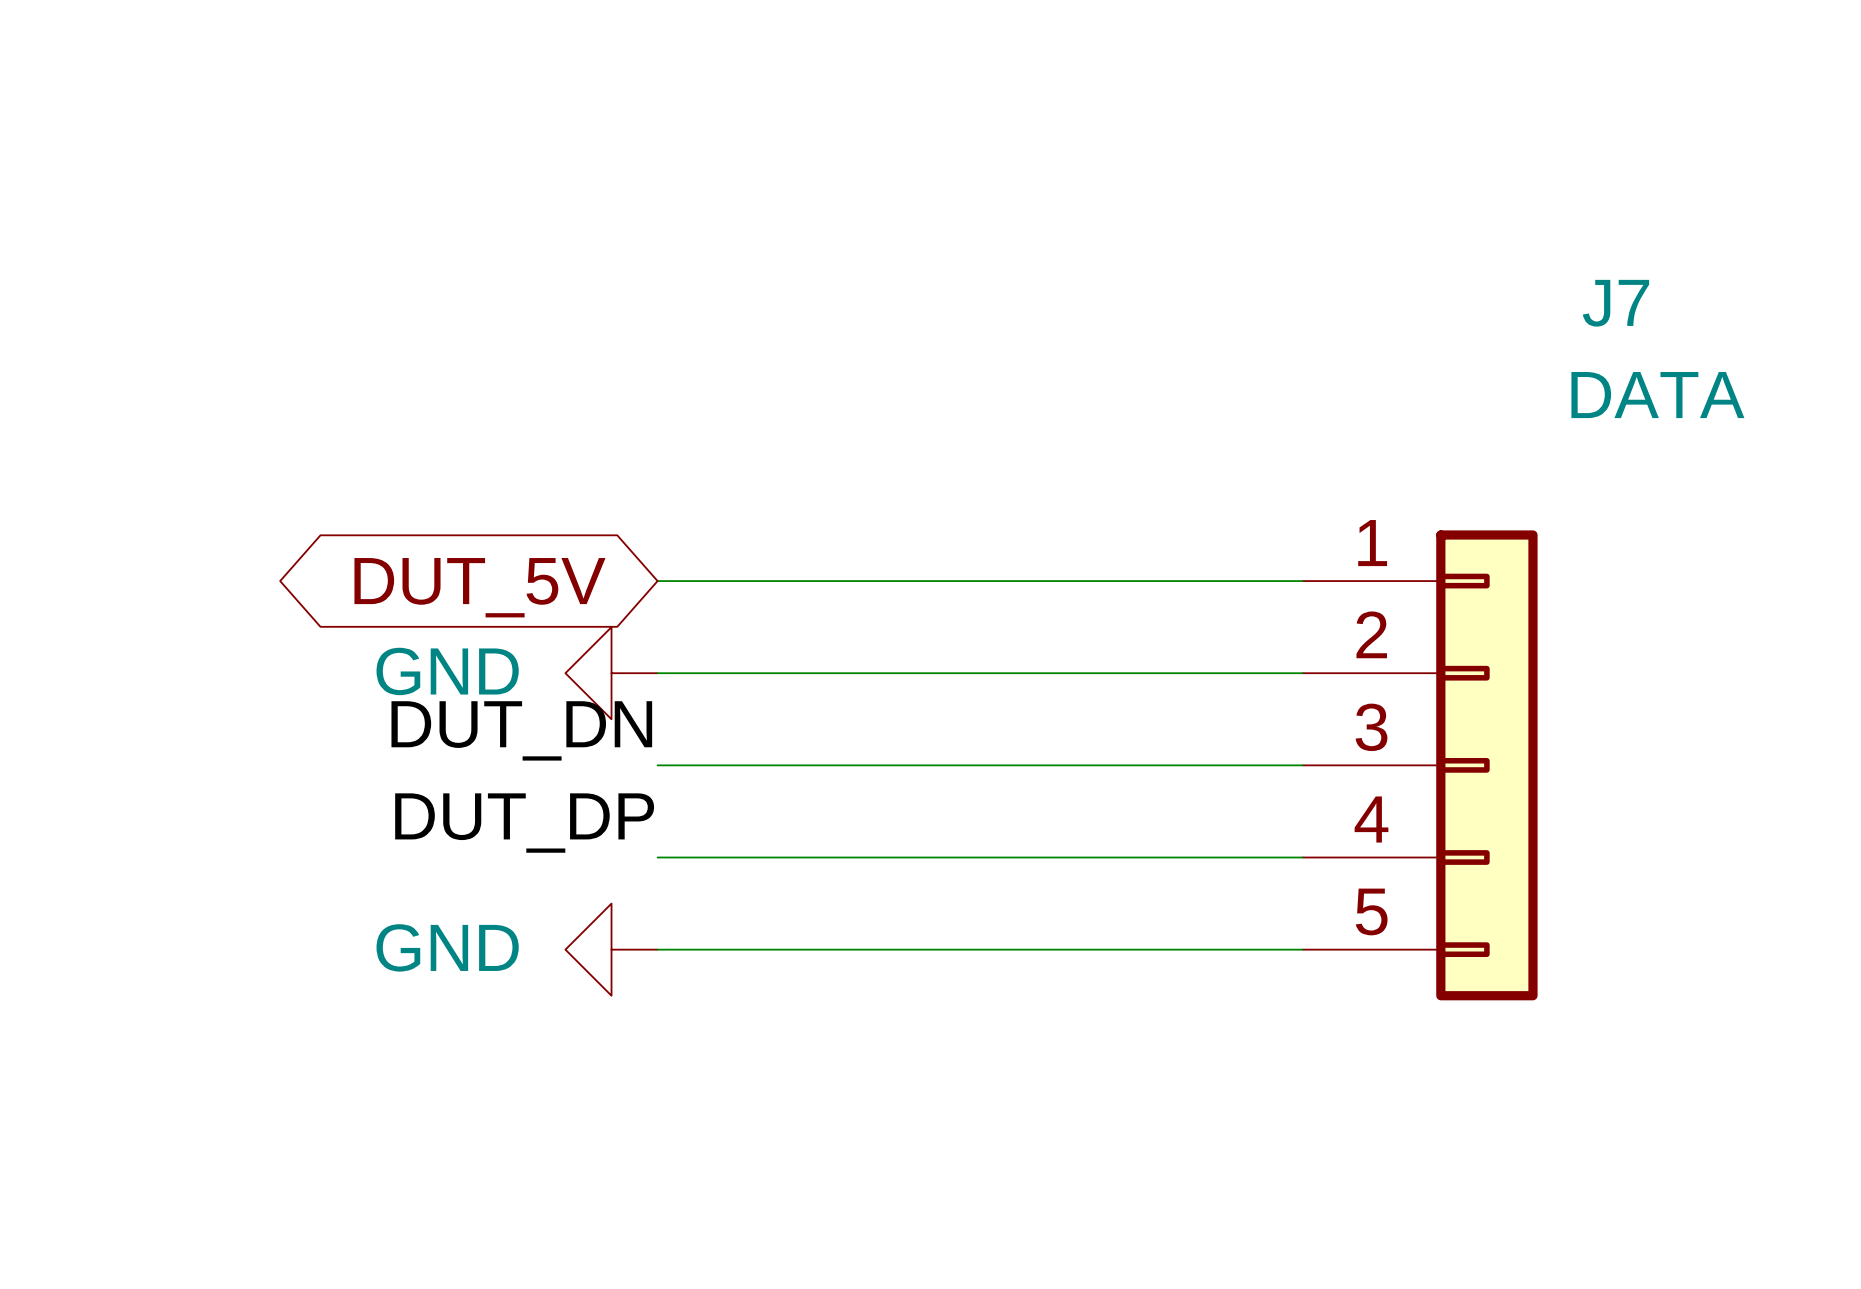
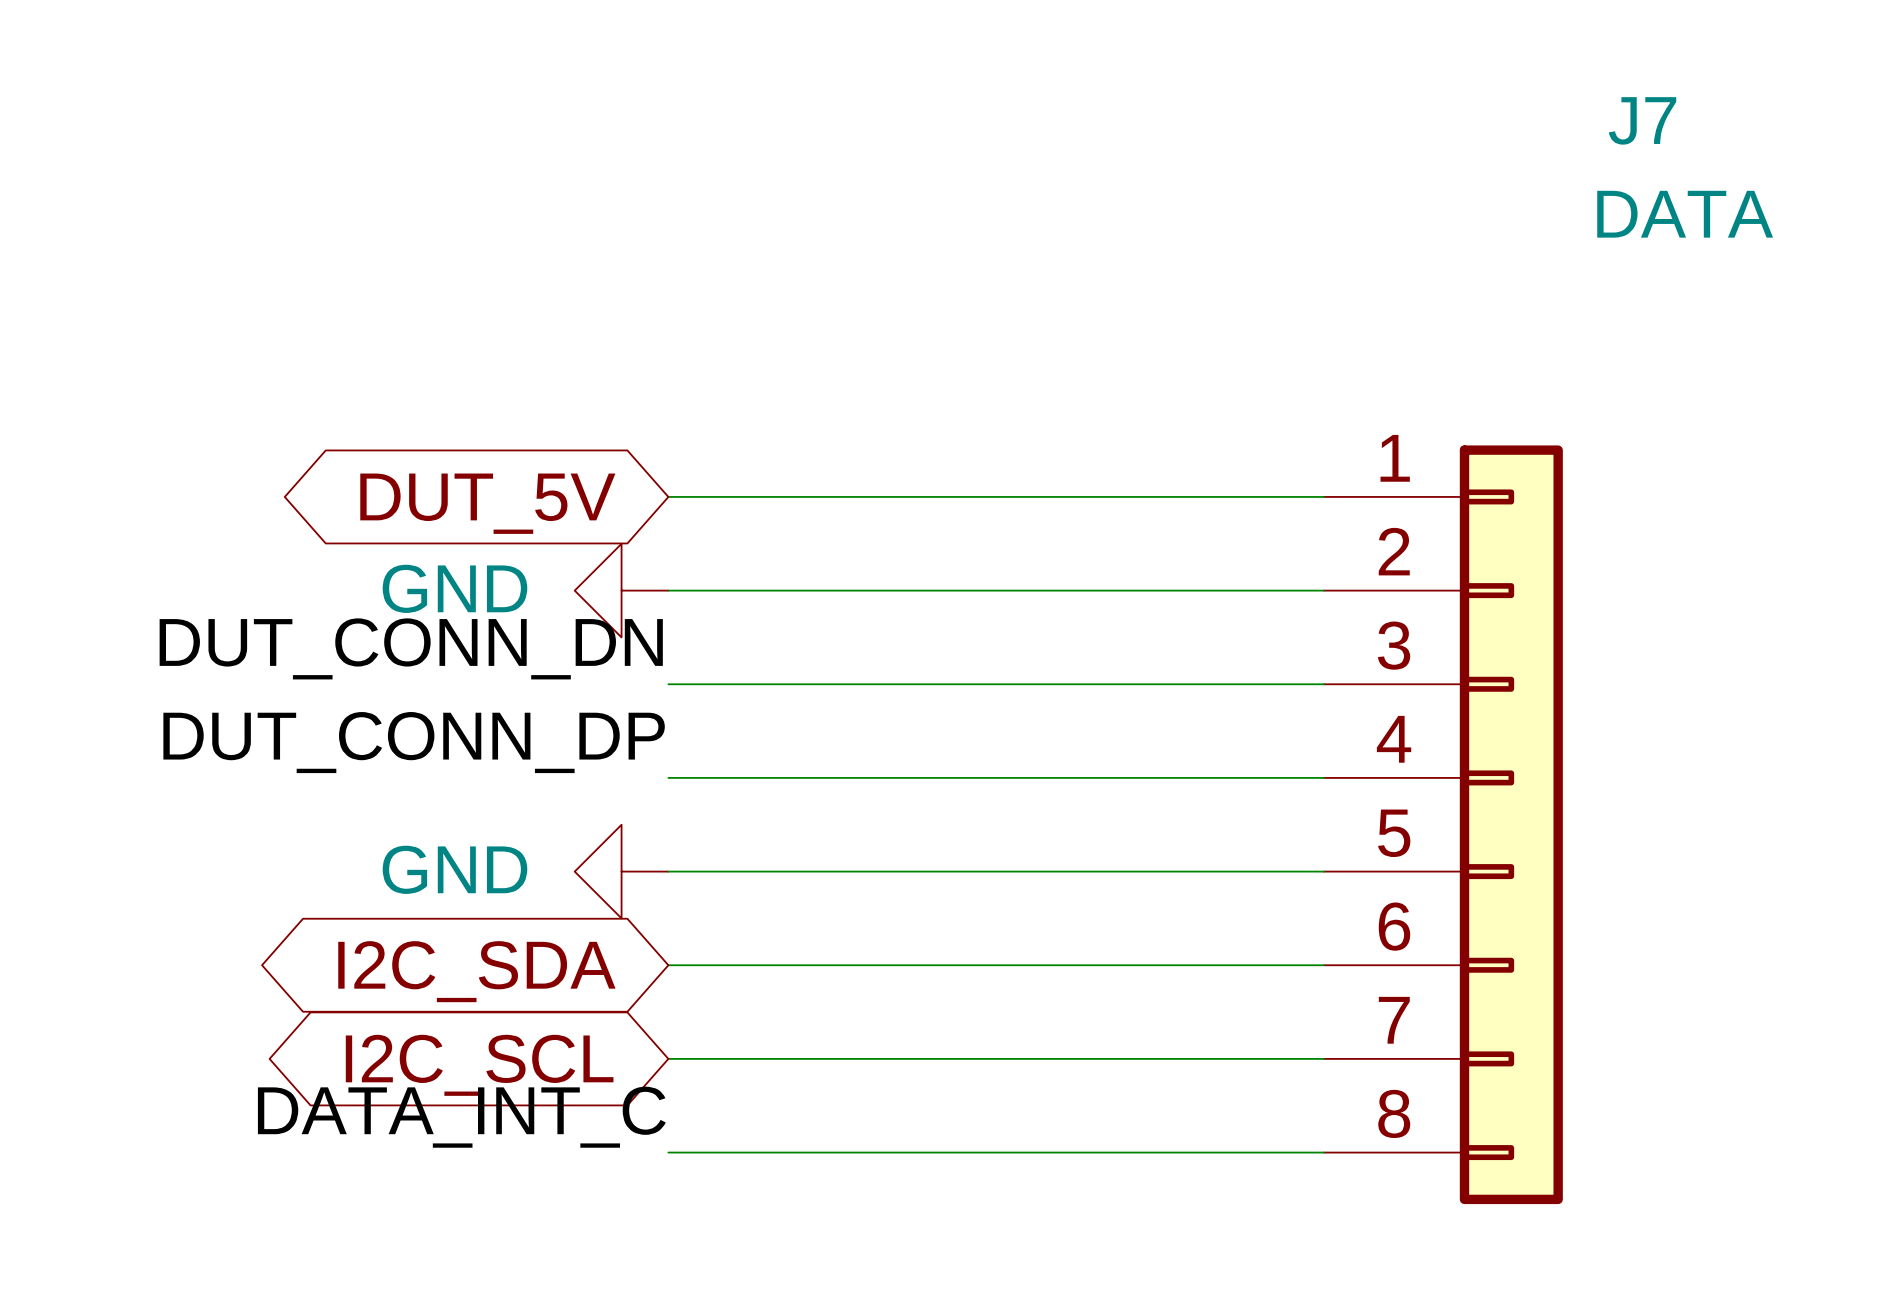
J7 name position: J7 (1615, 303) -> J7 (1642, 120)
J7 value position: DATA (1657, 395) -> DATA (1685, 214)
wire: none -> (668, 496) (1324, 496)
J7 symbol: [1302, 530, 1538, 1001] -> [1324, 445, 1563, 1205]
power symbol: none -> GND (621, 590)
global label position: DUT_5V (479, 587) -> DUT_5V (487, 503)
label: none -> DUT_CONN_DN (411, 648)
power symbol: GND (611, 673) -> none
label: DUT_DN (521, 730) -> DUT_CONN_DP (414, 742)
label: DUT_DP (524, 823) -> none
power symbol: none -> GND (621, 871)
power symbol: GND (611, 949) -> none
global label: none -> I2C_SDA (476, 971)
wire: none -> (668, 1058) (1324, 1058)
global label: none -> I2C_SCL (479, 1065)
label: none -> DATA_INT_C (461, 1117)
wire: none -> (668, 1152) (1324, 1152)

